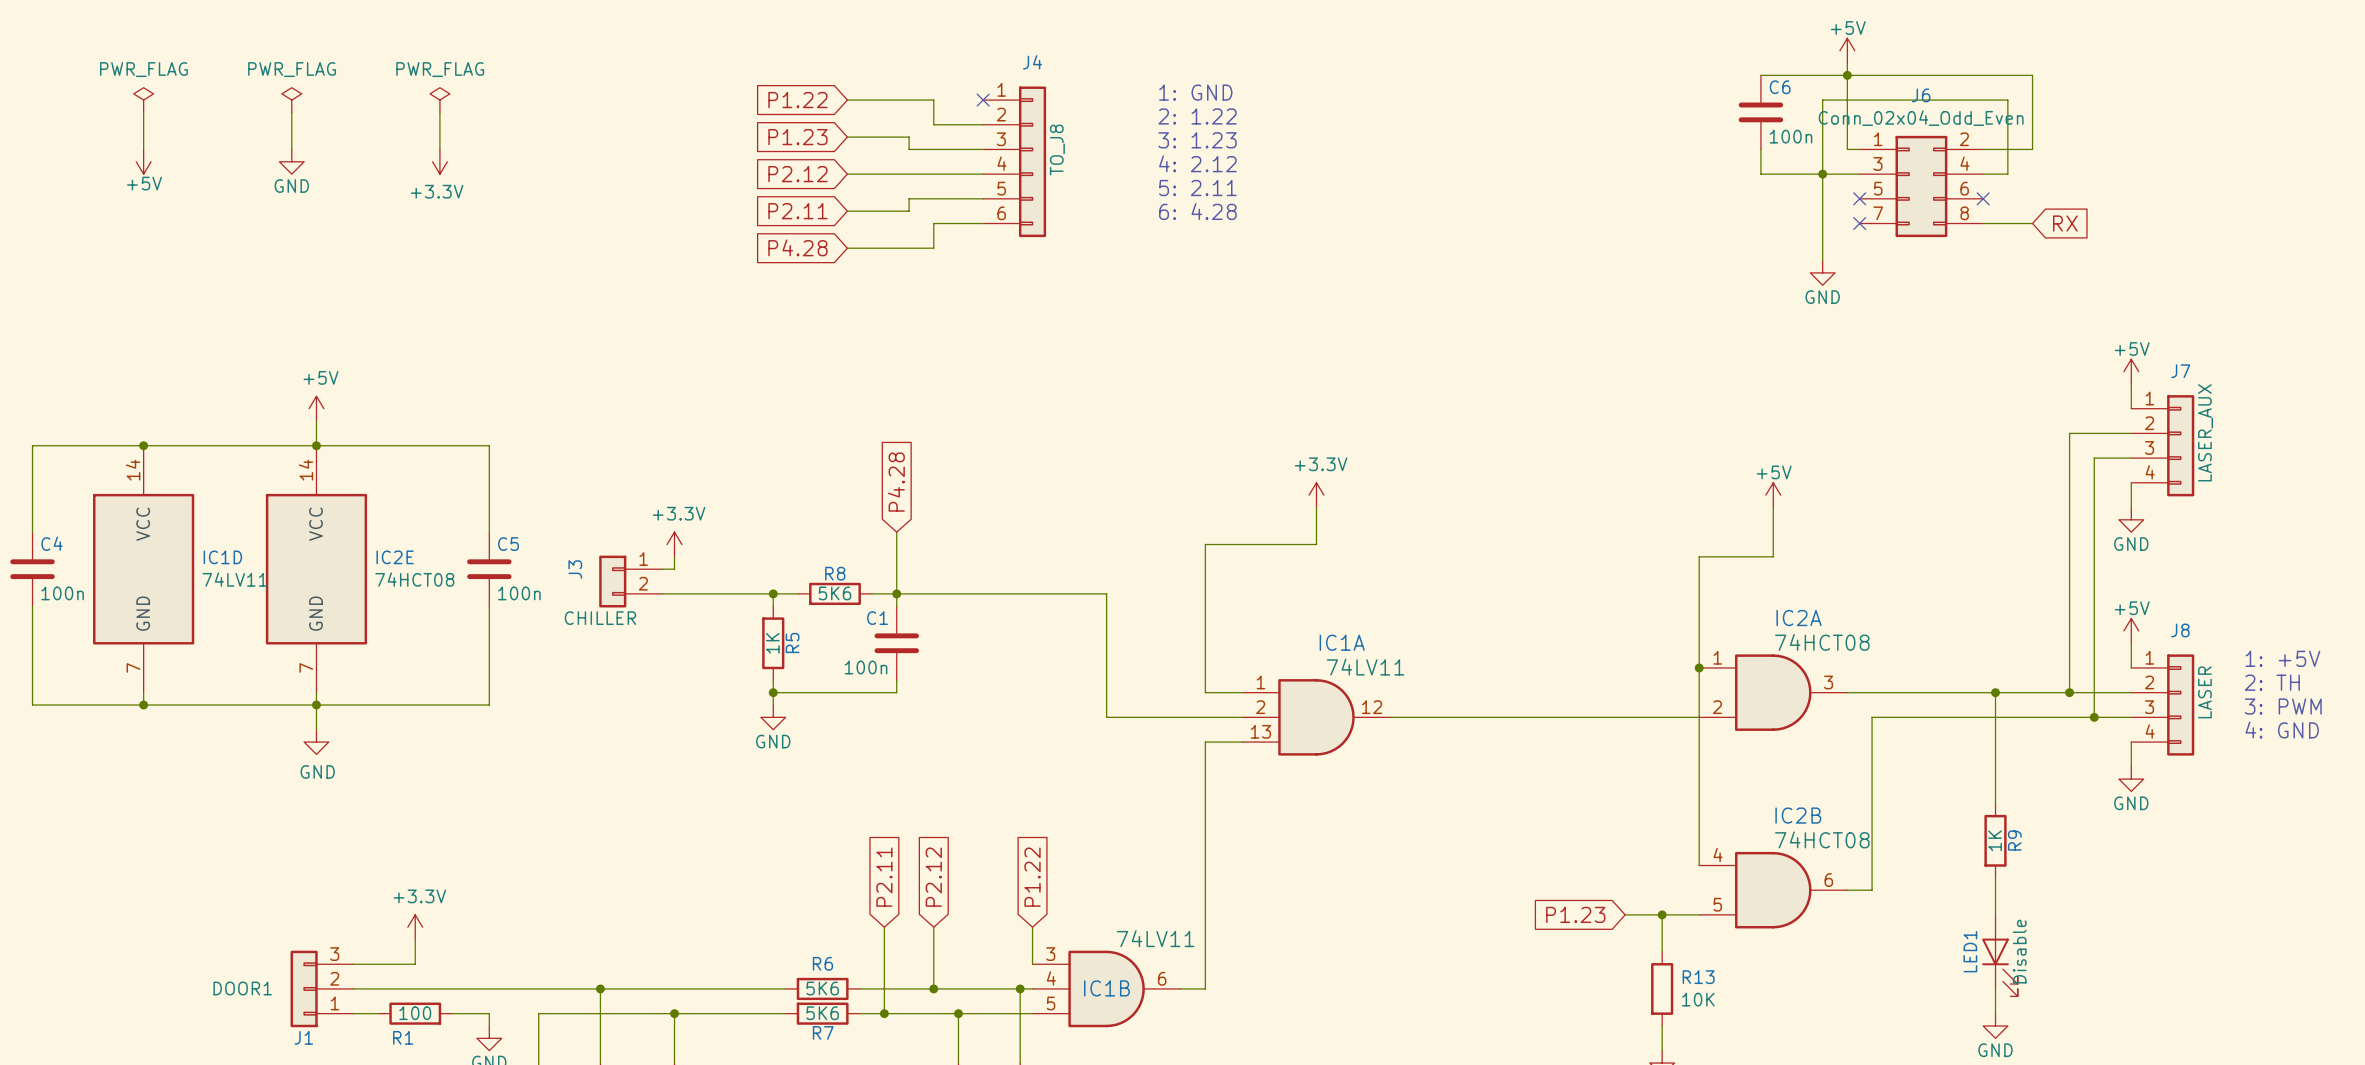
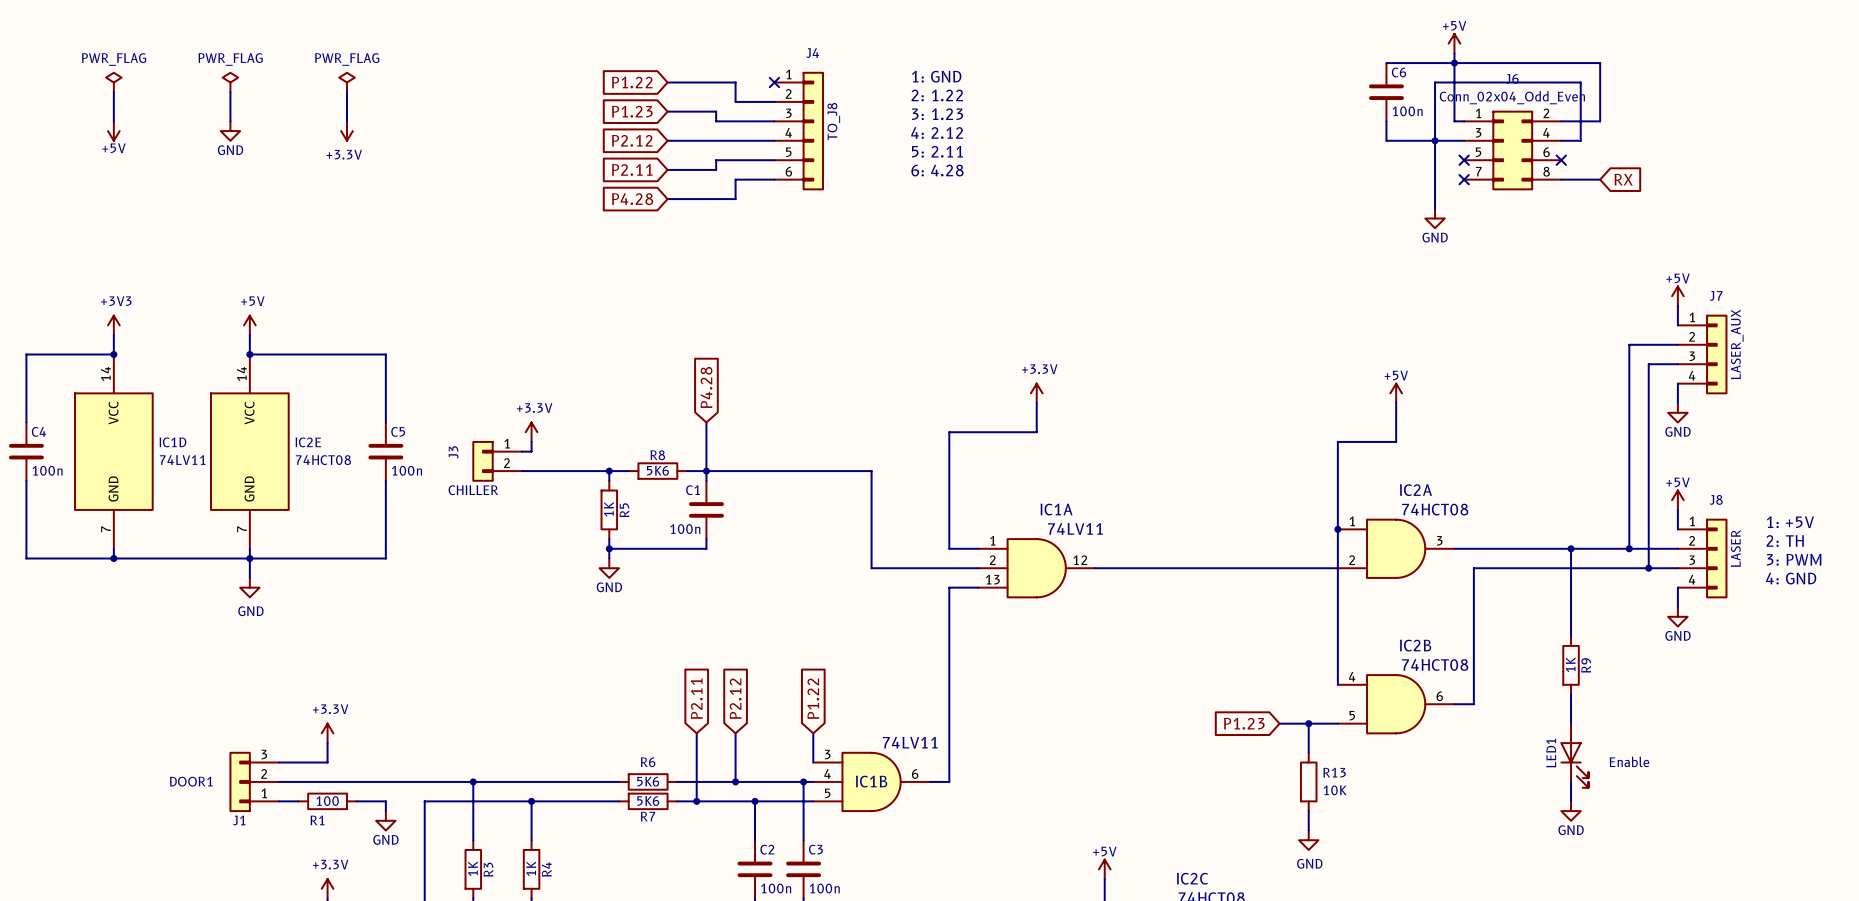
power symbol: none -> +3V3 (113, 325)
wire: (143, 445) (316, 445) -> (113, 354) (113, 335)
LED1 value: Disable (2019, 951) -> Enable (1629, 761)

